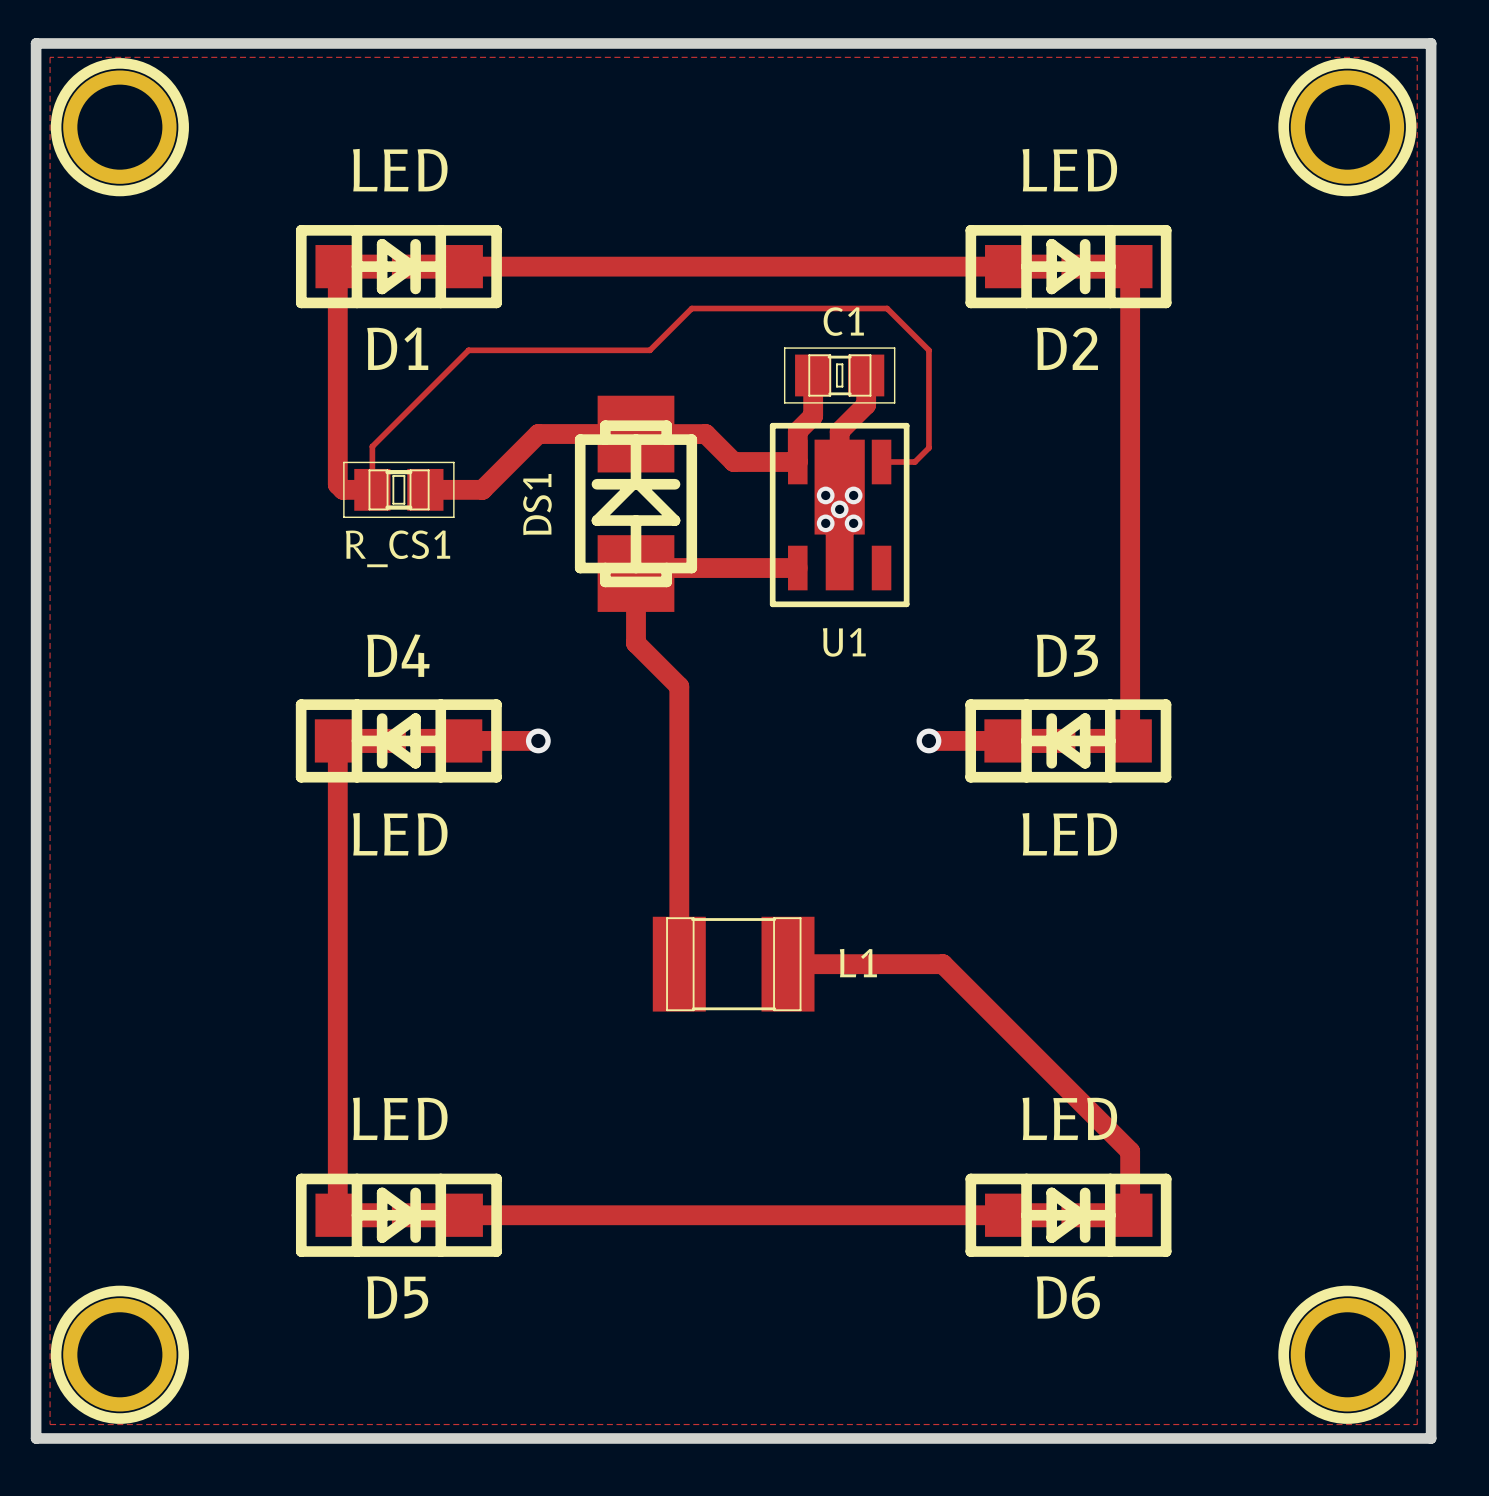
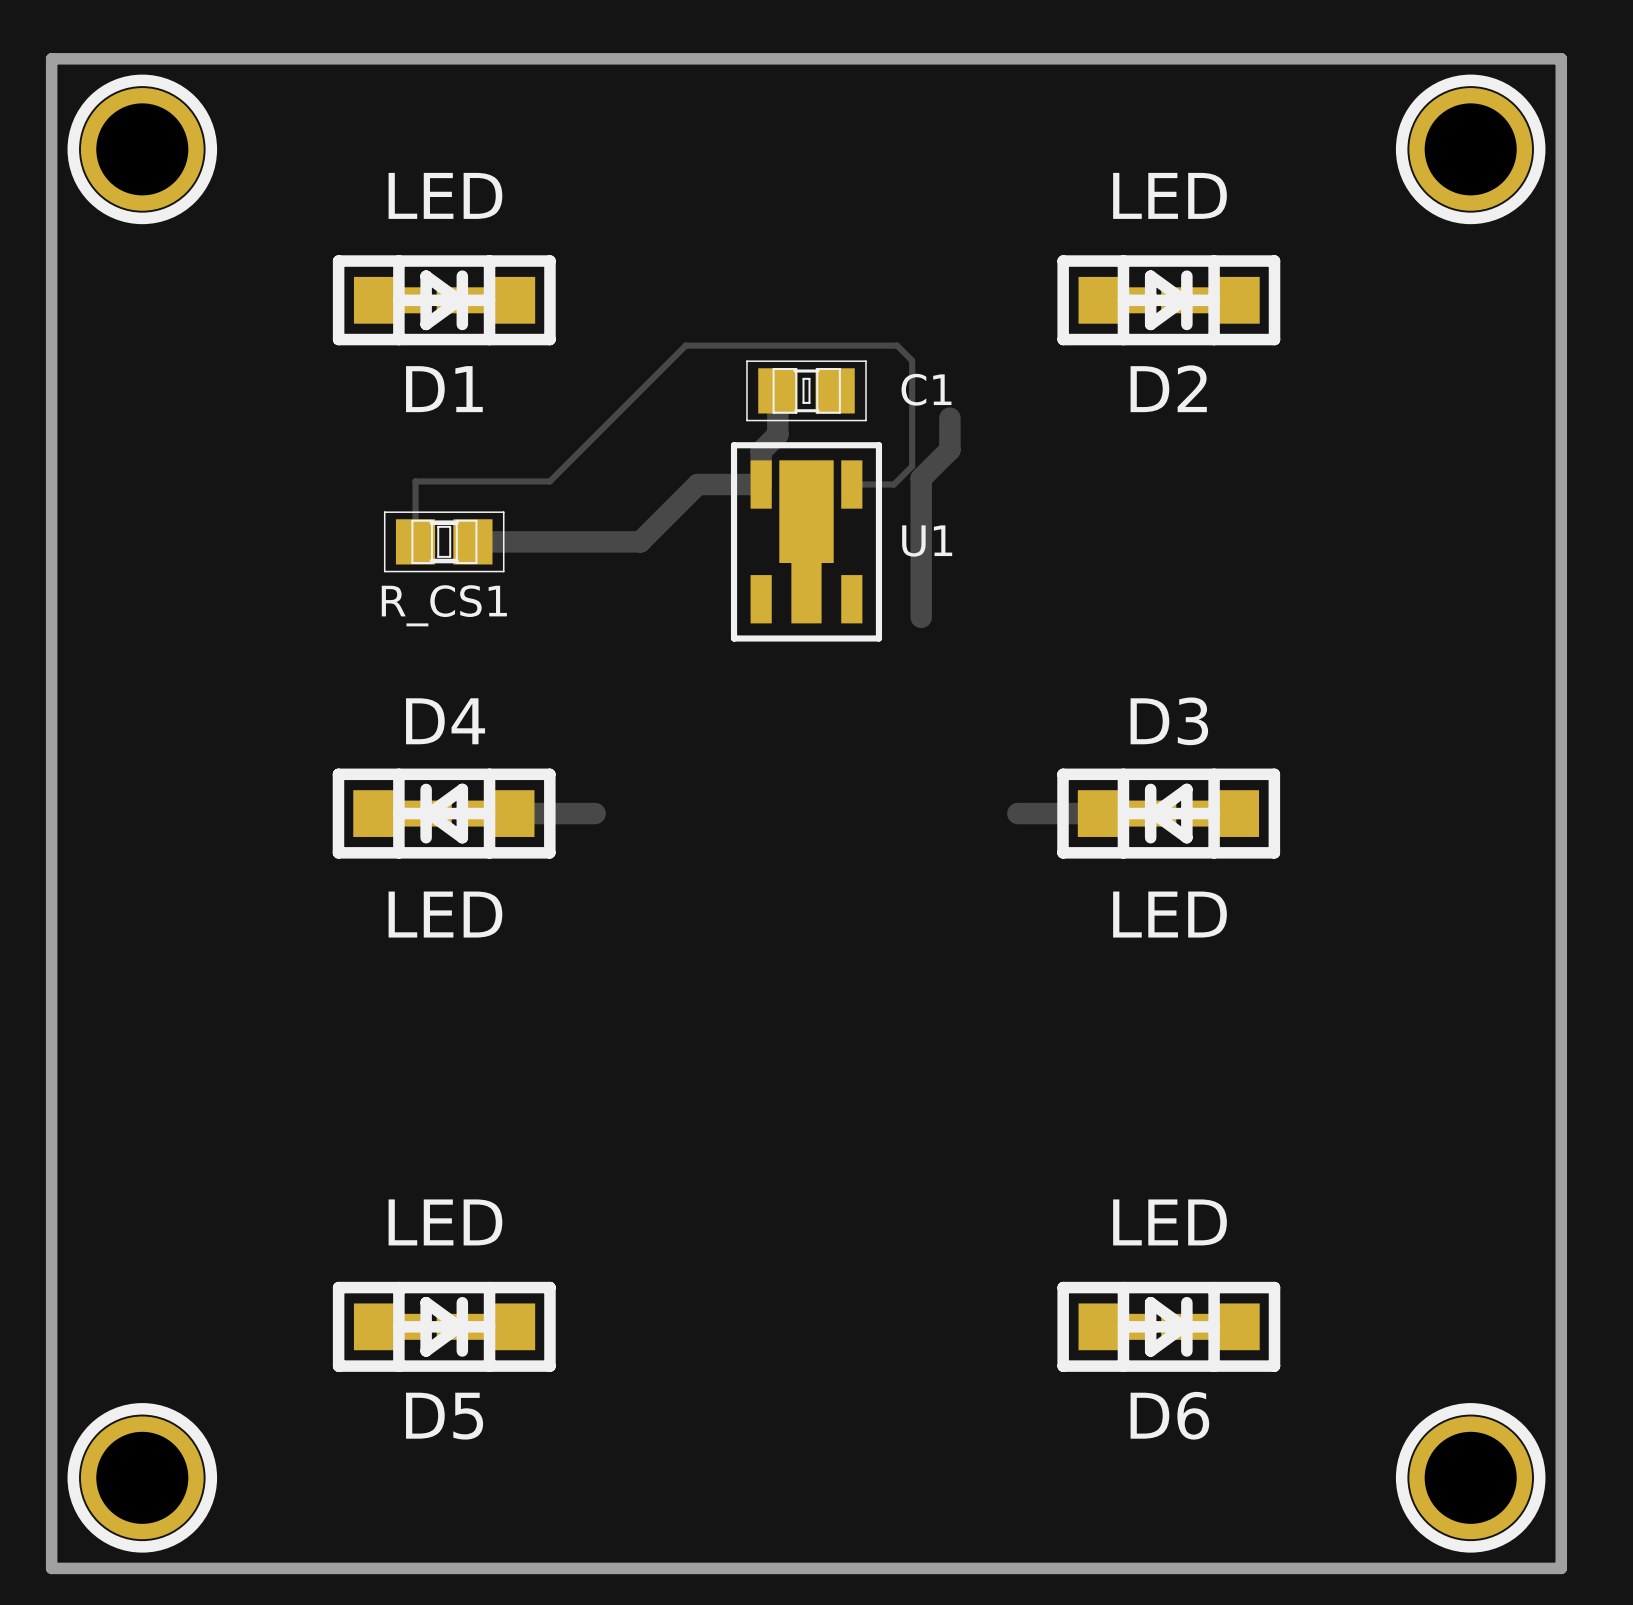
zone outline: (50, 57) (1417, 57) (1417, 1424) (50, 1424) (50, 57) -> none
track: (368, 266) (337, 266) (337, 484) (343, 489) (372, 489) -> none
track: (415, 266) (1038, 266) -> none
track: (1085, 266) (1130, 266) (1130, 740) (1098, 740) -> none
track: (691, 308) (649, 350) (468, 350) (372, 446) -> (761, 345) (685, 345) (549, 481) (415, 481) (415, 495)
track: (817, 308) (887, 308) (928, 350) (928, 447) (914, 462) (881, 462) -> (897, 345) (912, 360) (912, 466) (893, 484) (851, 484)
C1 name position: C1 (843, 321) -> C1 (926, 389)
track: (813, 375) (813, 415) (797, 431) (797, 462) (733, 462) (705, 434) (538, 434) (482, 489) -> (777, 390) (777, 434) (761, 451) (761, 484) (697, 484) (640, 541) (534, 541)
C1 position: (839, 375) -> (806, 390)
via: (825, 495) -> none
via: (853, 495) -> none
DS1: (636, 503) -> none
via: (839, 509) -> none
U1 position: (839, 515) -> (806, 541)
via: (825, 523) -> none
via: (853, 523) -> none
track: (797, 568) (641, 568) (636, 573) (636, 643) (679, 686) (679, 964) -> none
U1 name position: U1 (844, 642) -> U1 (927, 541)
track: (382, 740) (337, 740) (337, 1215) (368, 1215) -> none
via: (538, 740) -> none
via: (928, 740) -> none
L1: (733, 964) -> none
track: (788, 964) (942, 964) (1130, 1151) (1130, 1215) (1085, 1215) -> none
track: (415, 1215) (1038, 1215) -> none

